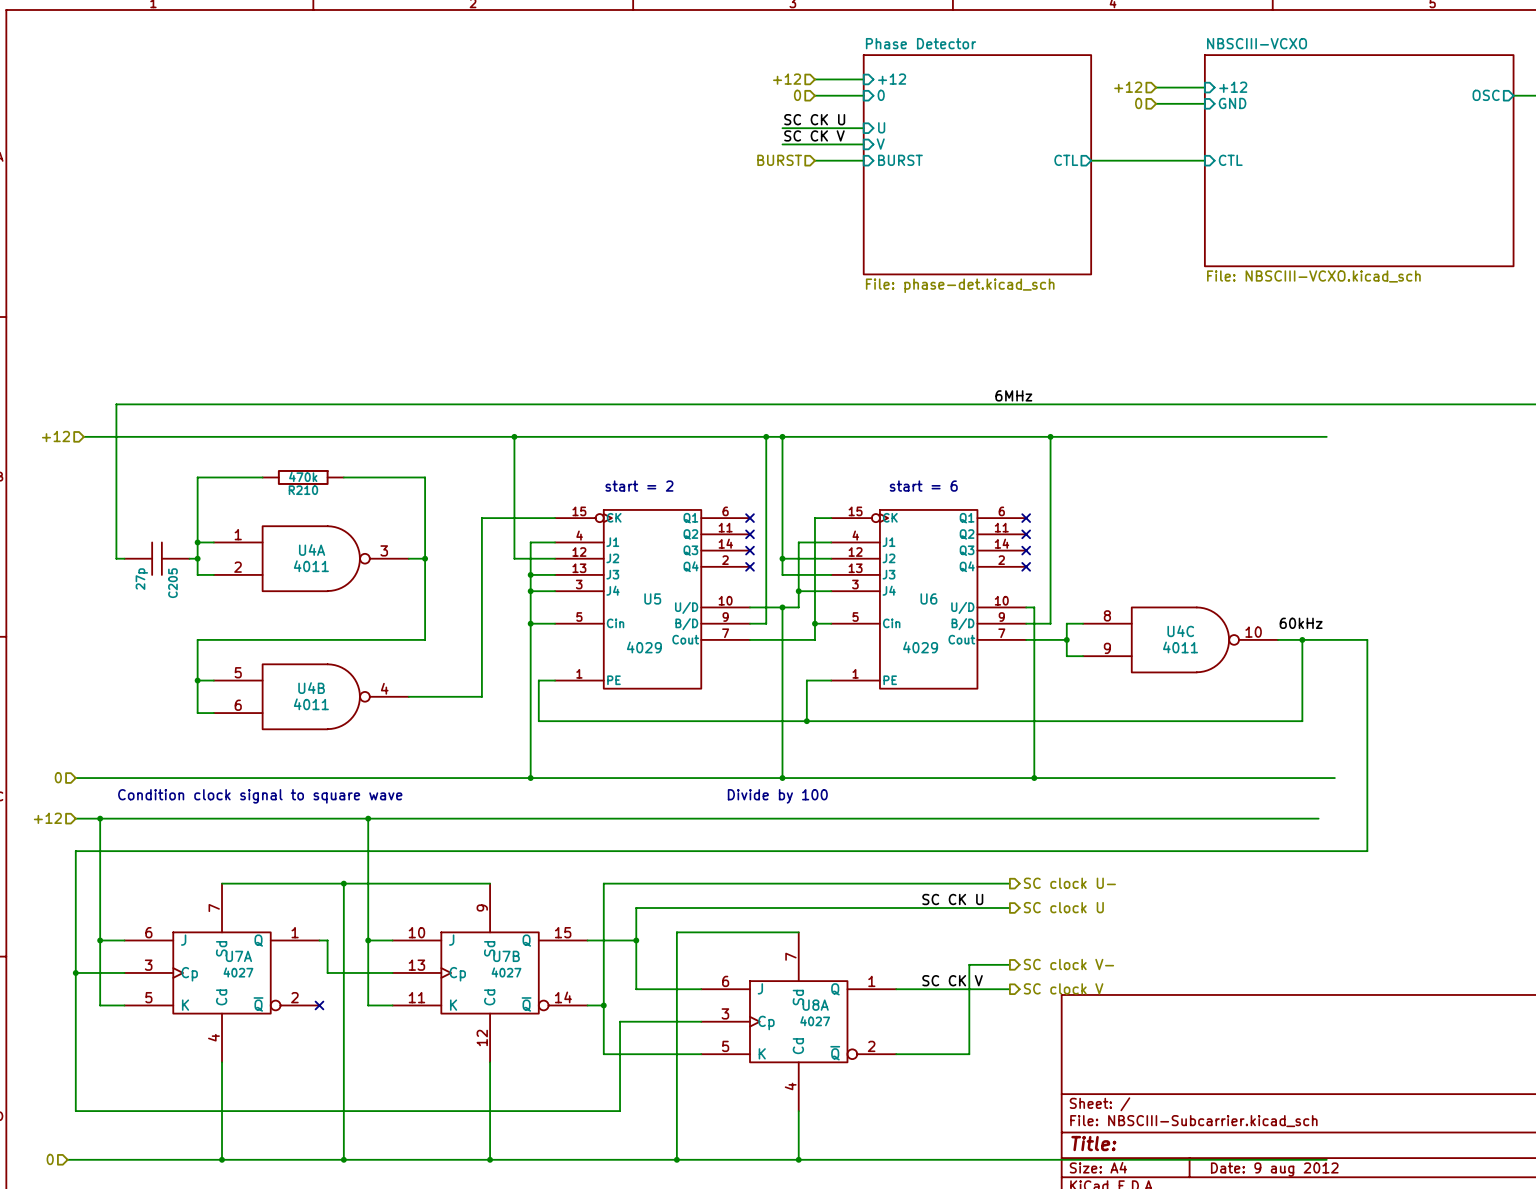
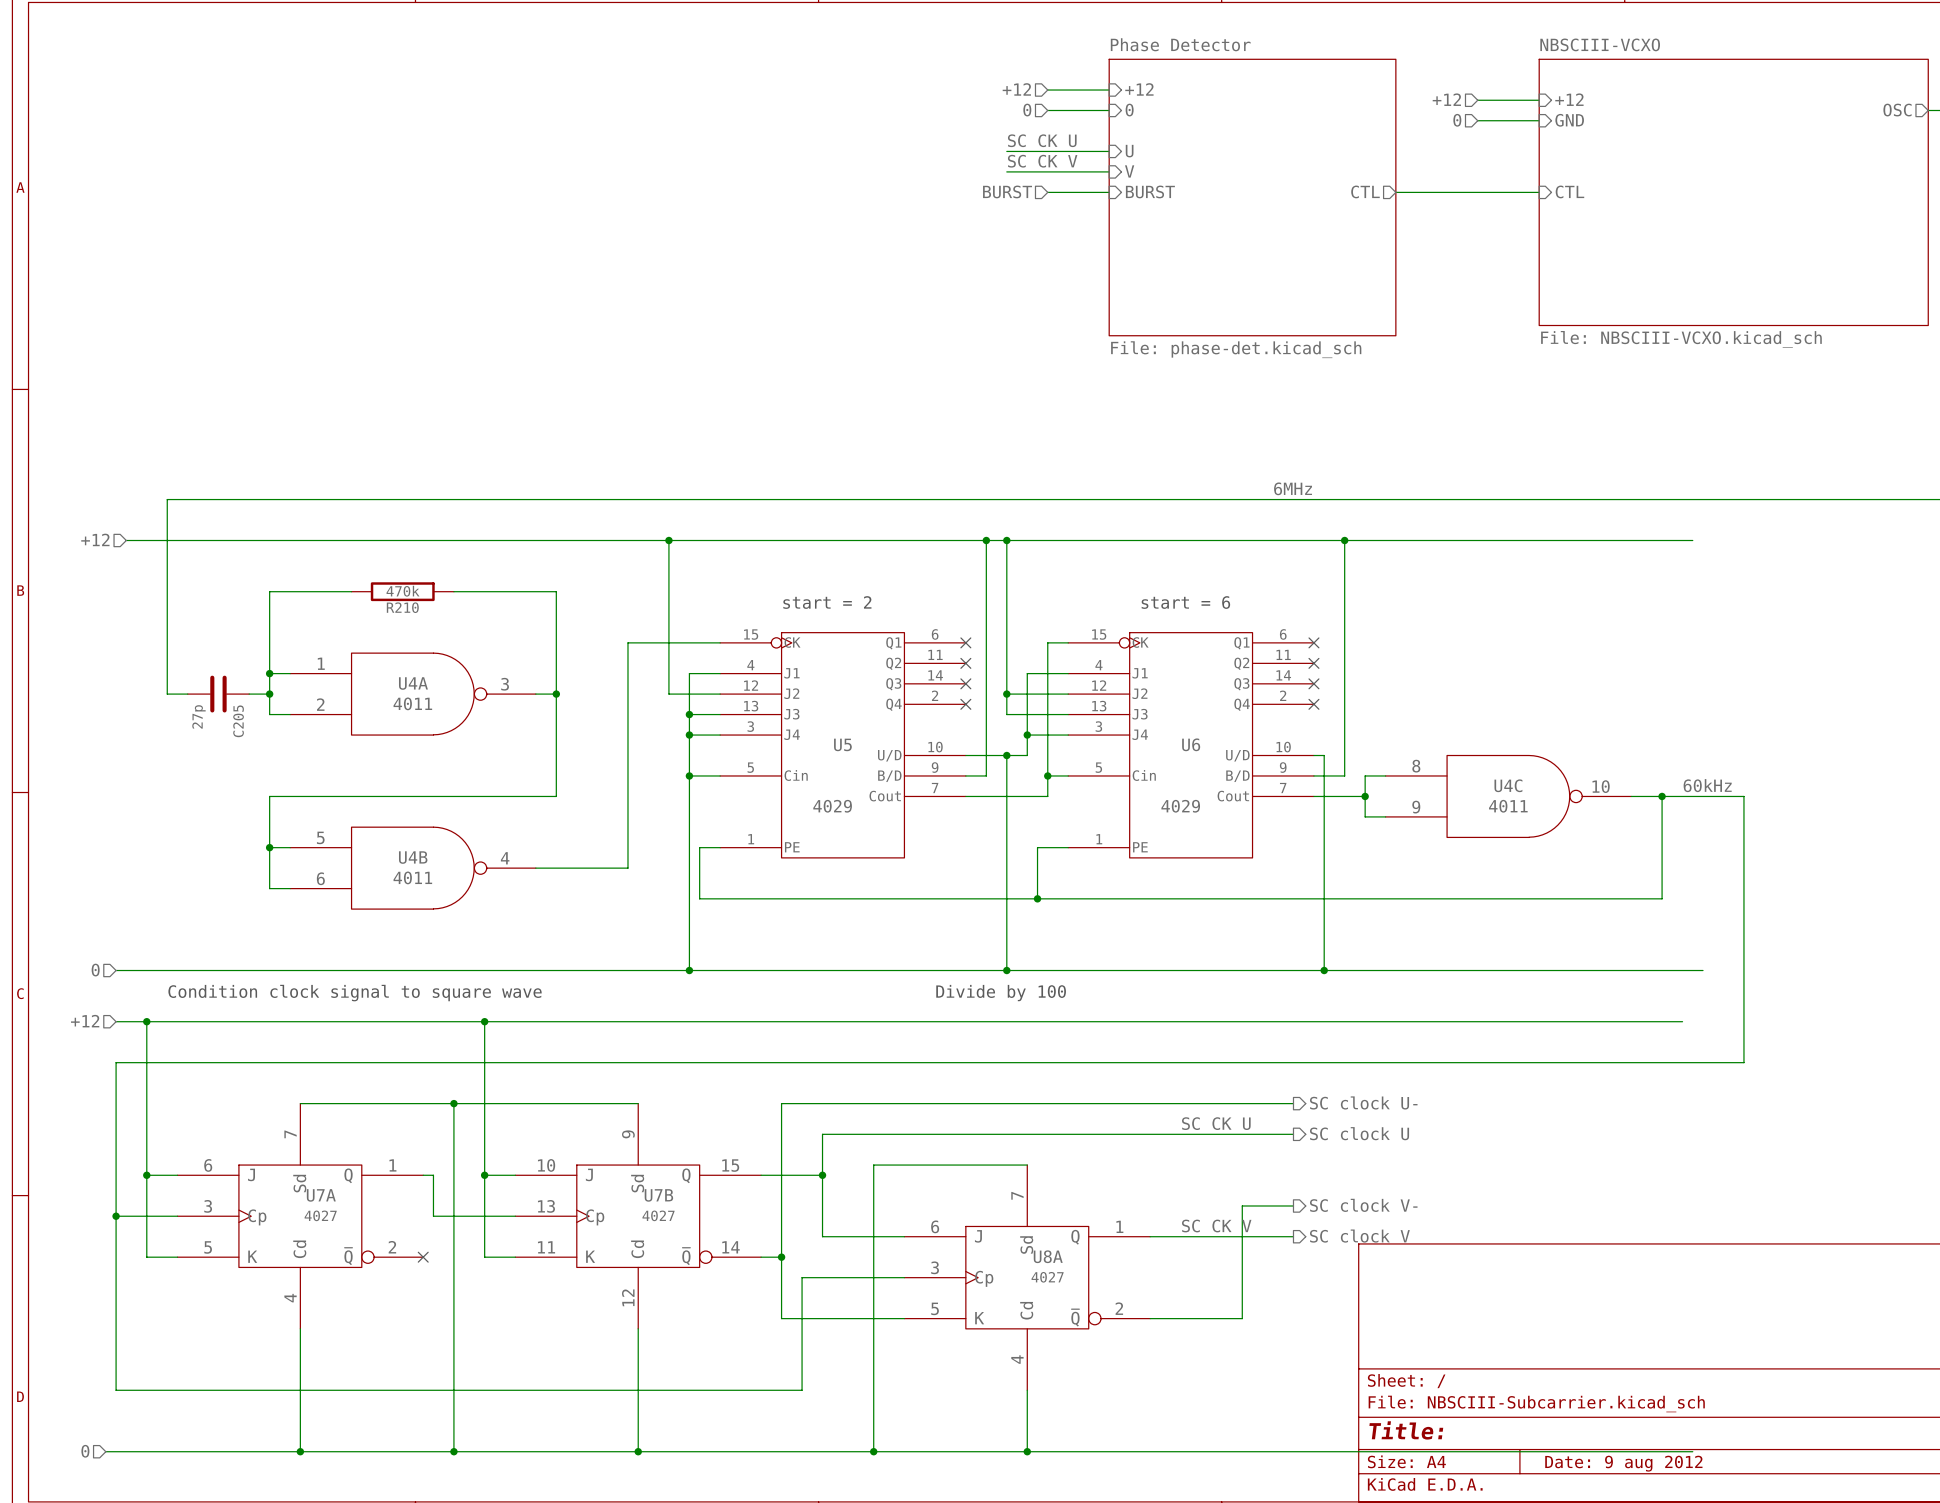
C205 symbol: [124, 541, 190, 576] -> [187, 675, 250, 713]
label position: 60kHz (1301, 623) -> 60kHz (1707, 785)

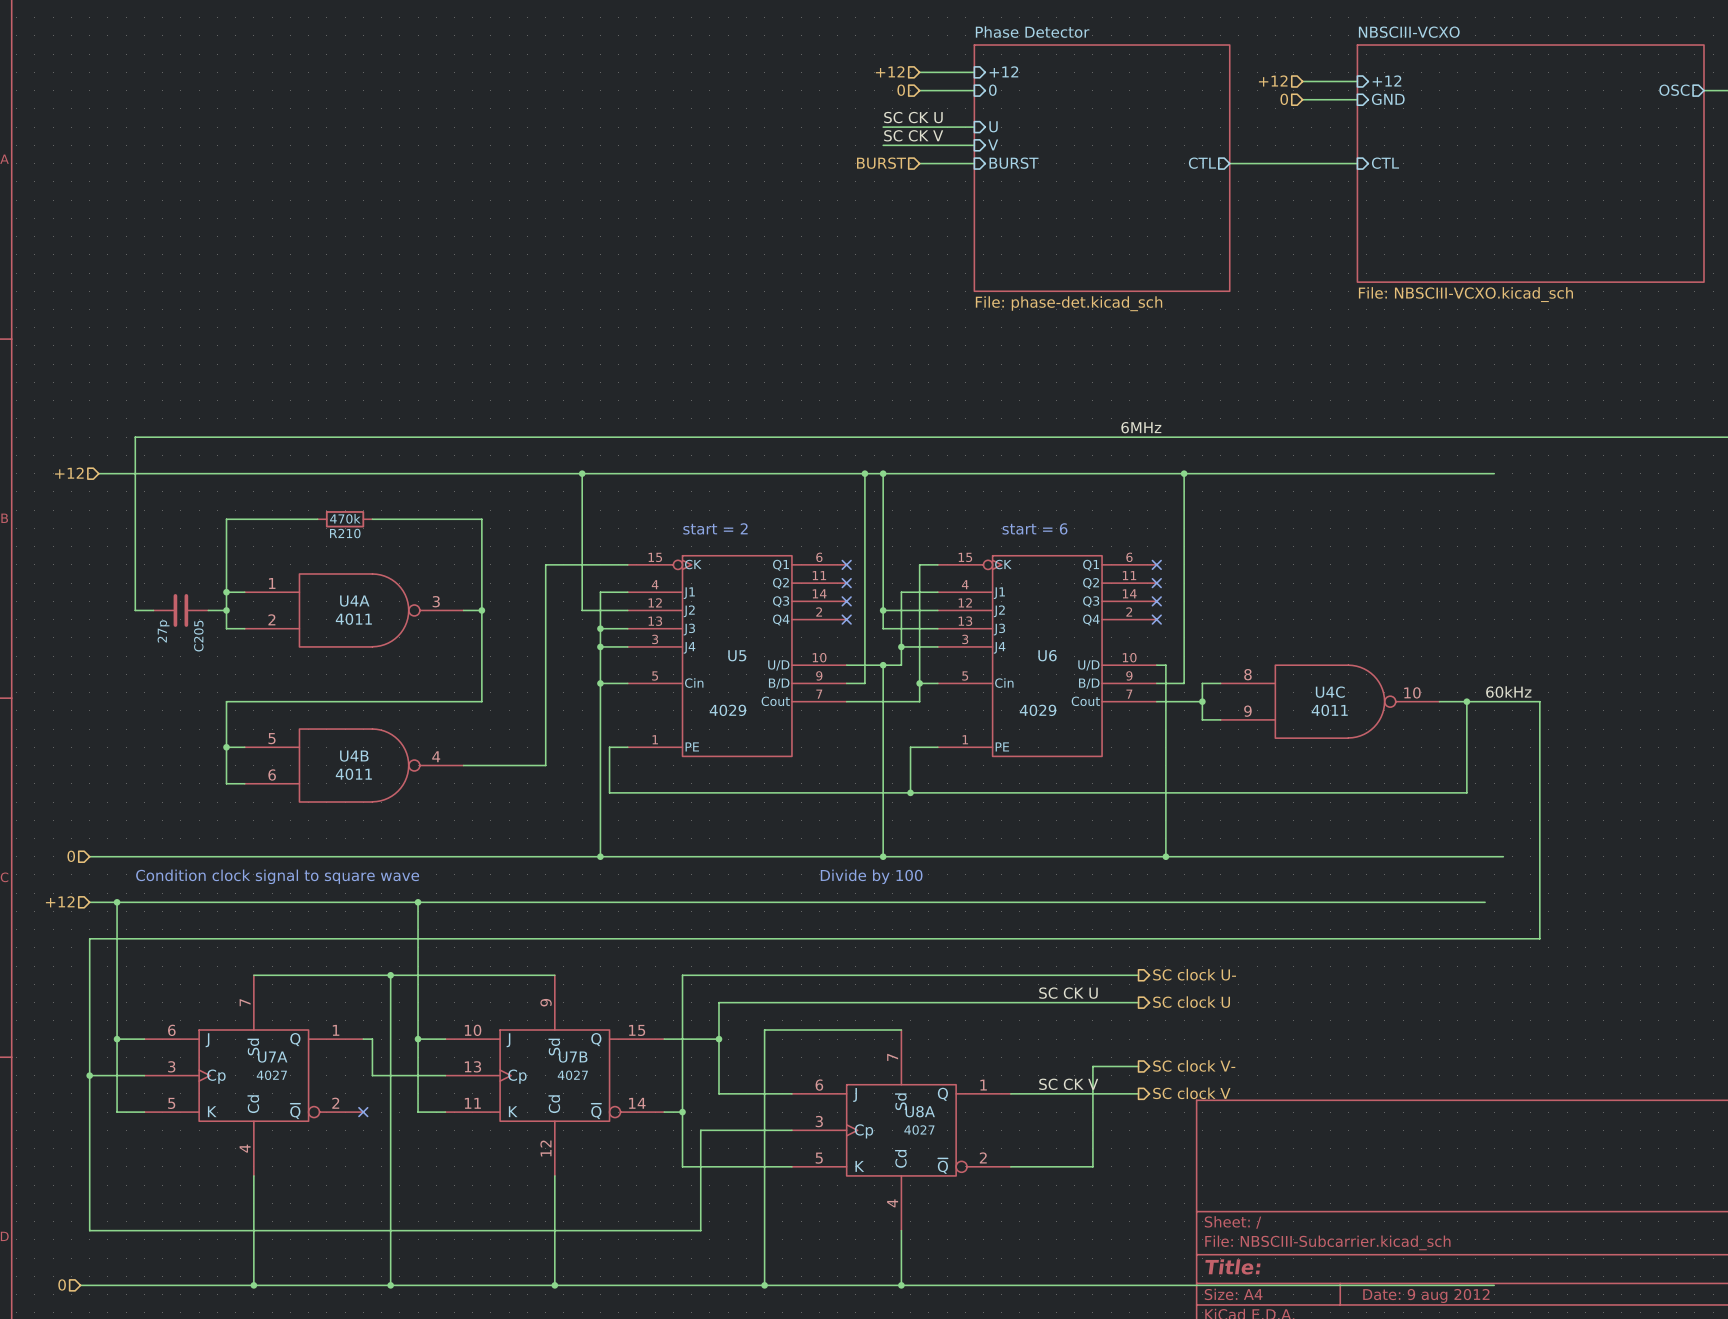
R210 symbol: [351, 582, 454, 602] -> [317, 511, 373, 528]

